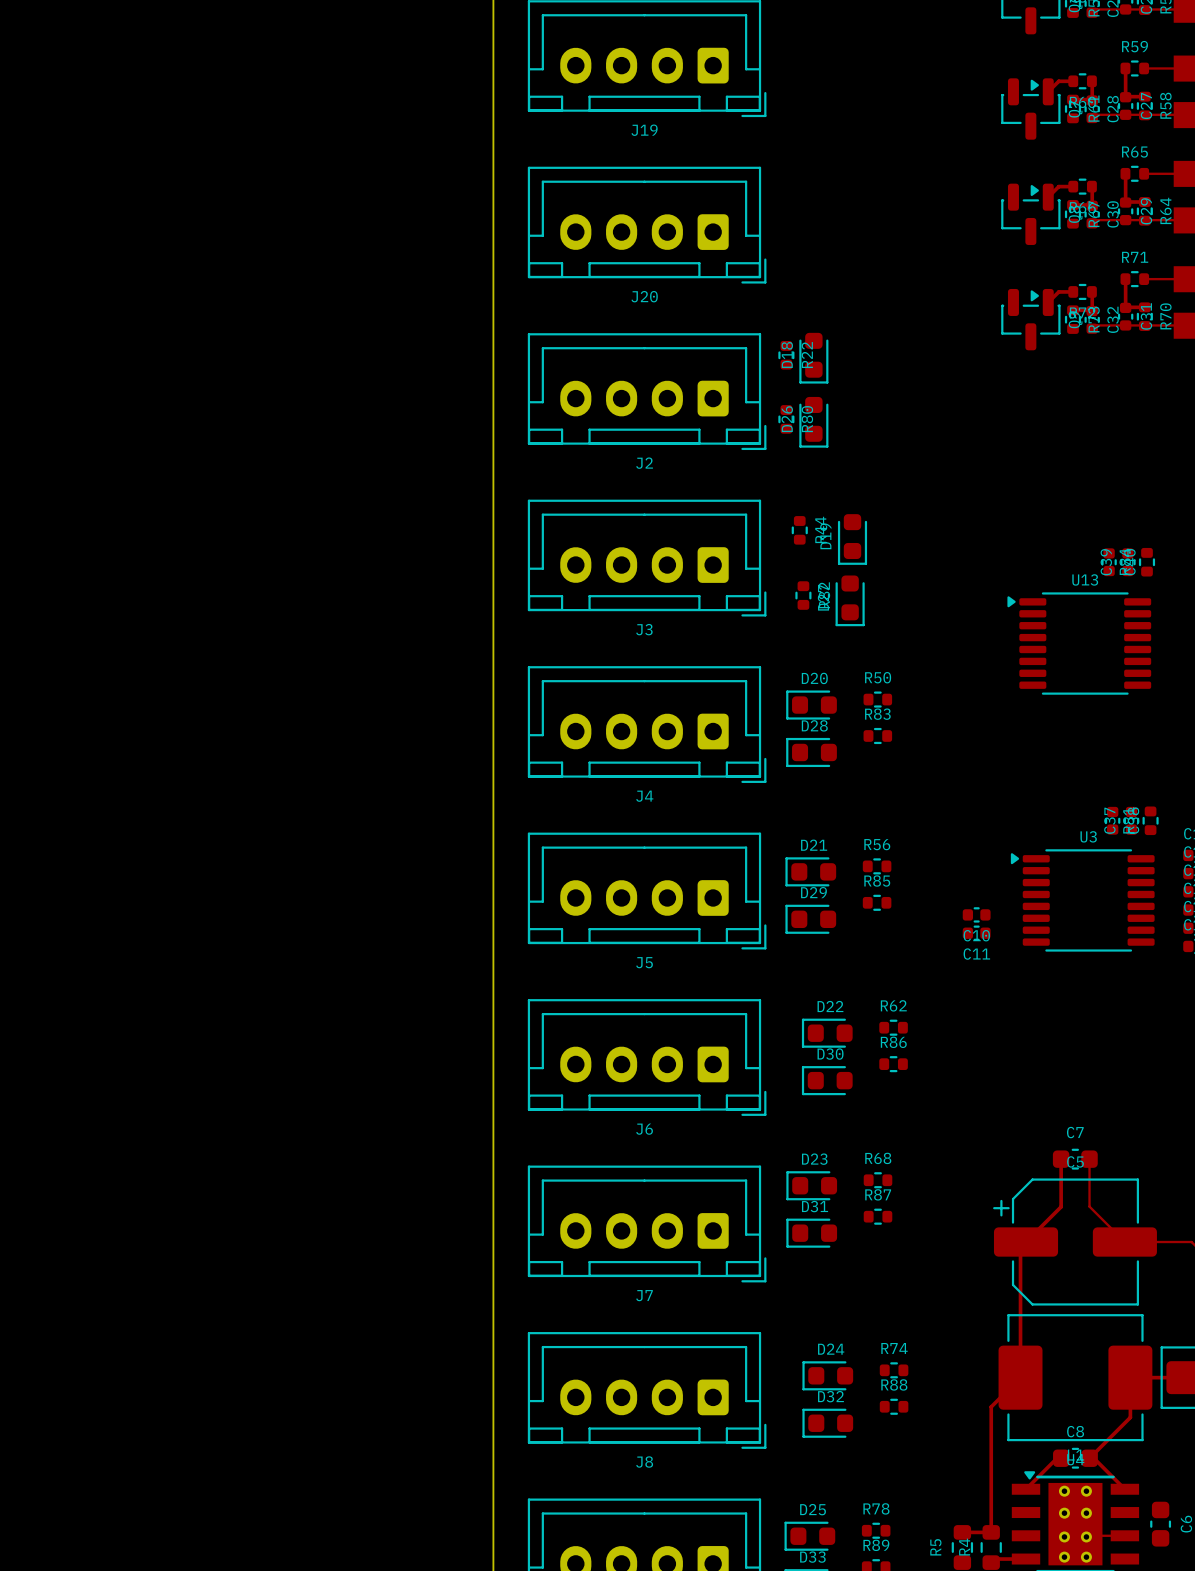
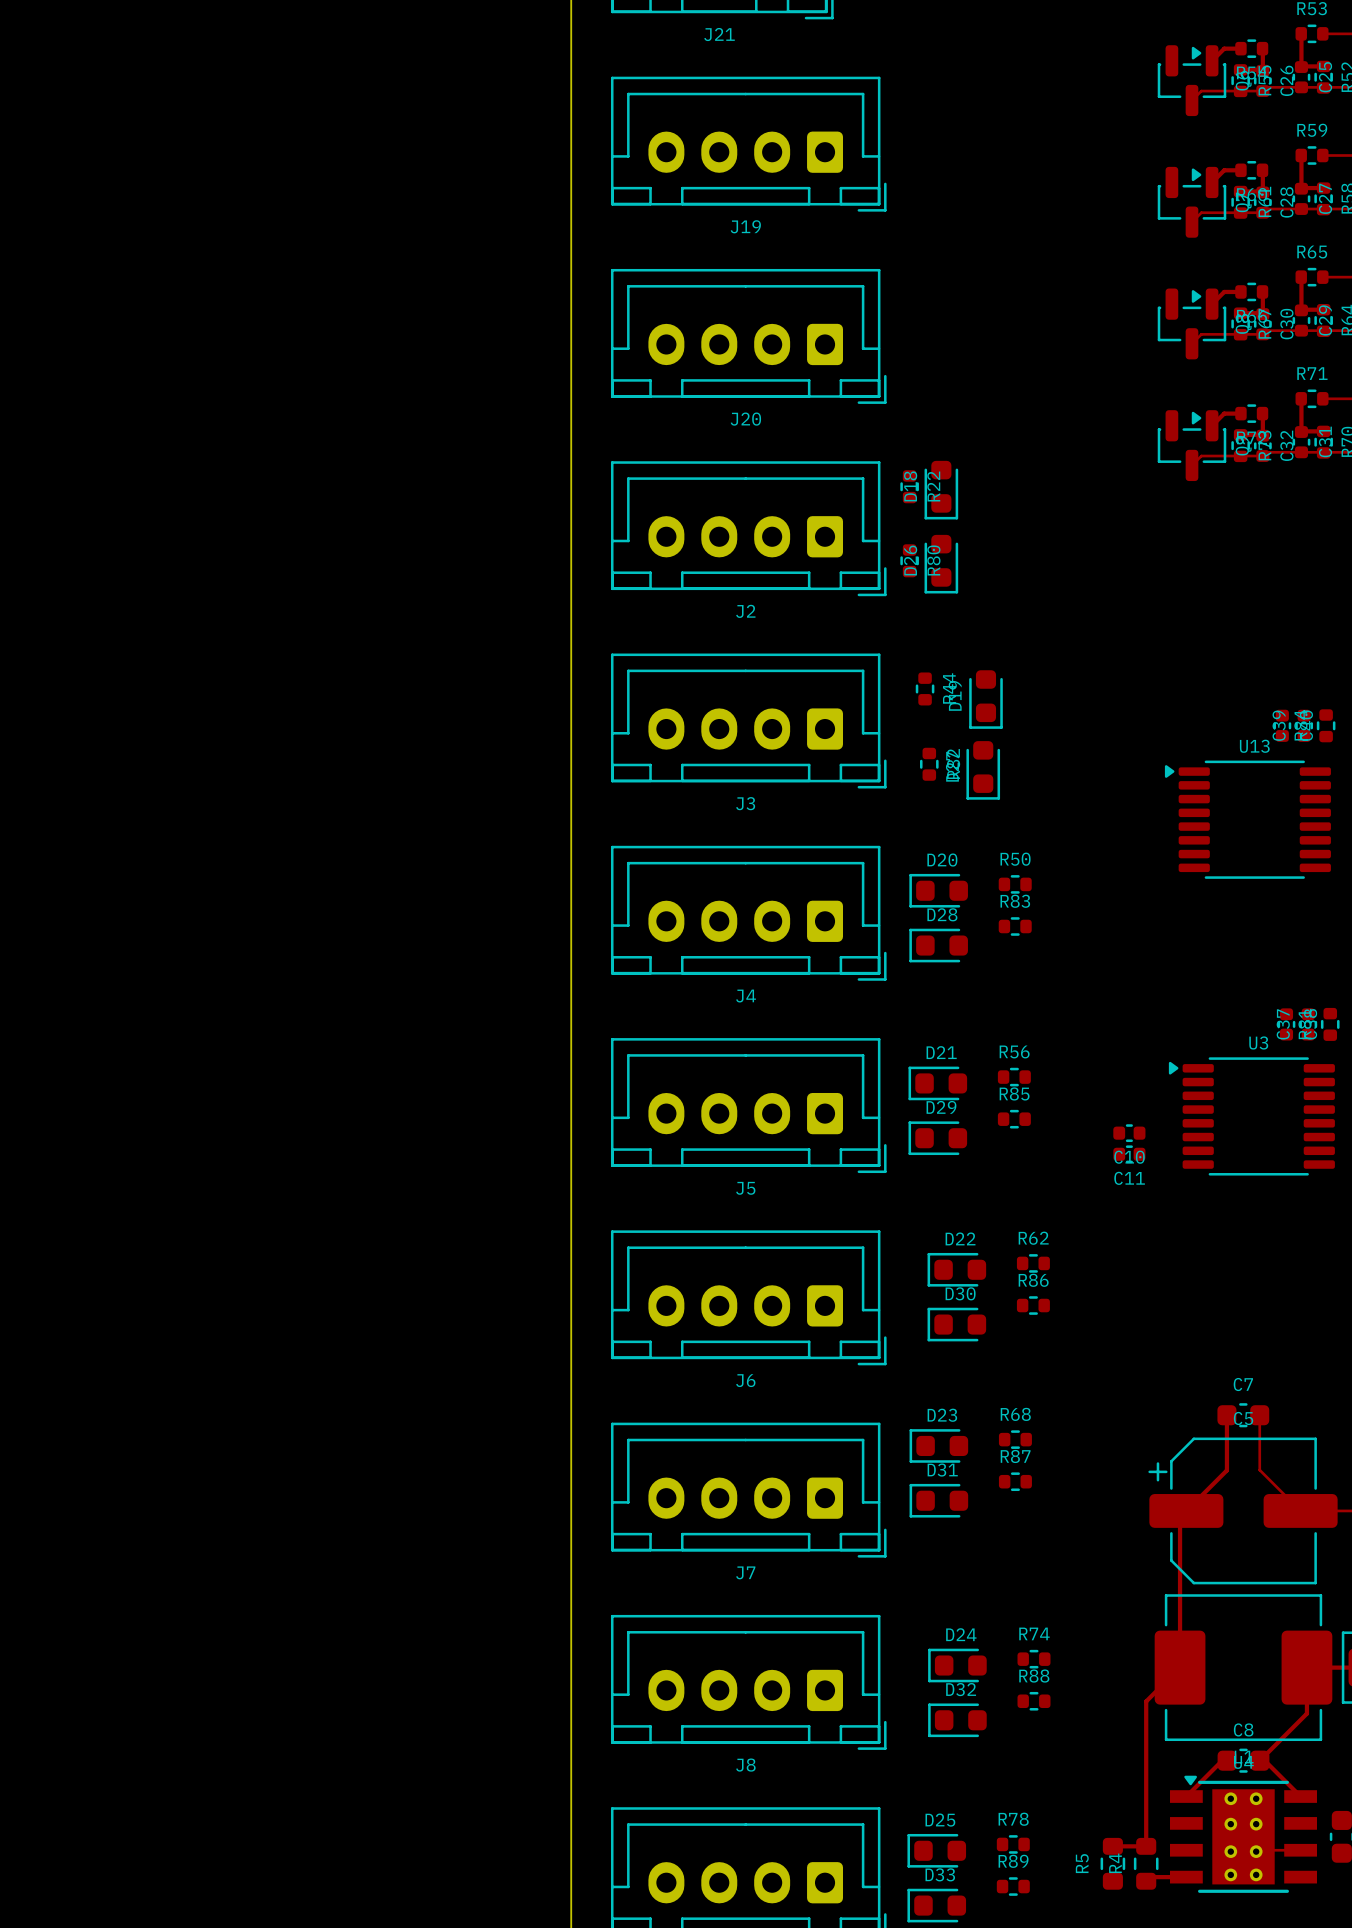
track: none -> (1262, 91) (1201, 91) (1191, 100)
track: none -> (1262, 212) (1201, 212) (1191, 222)
track: none -> (1262, 334) (1201, 334) (1191, 343)
track: none -> (1262, 456) (1201, 456) (1191, 465)

